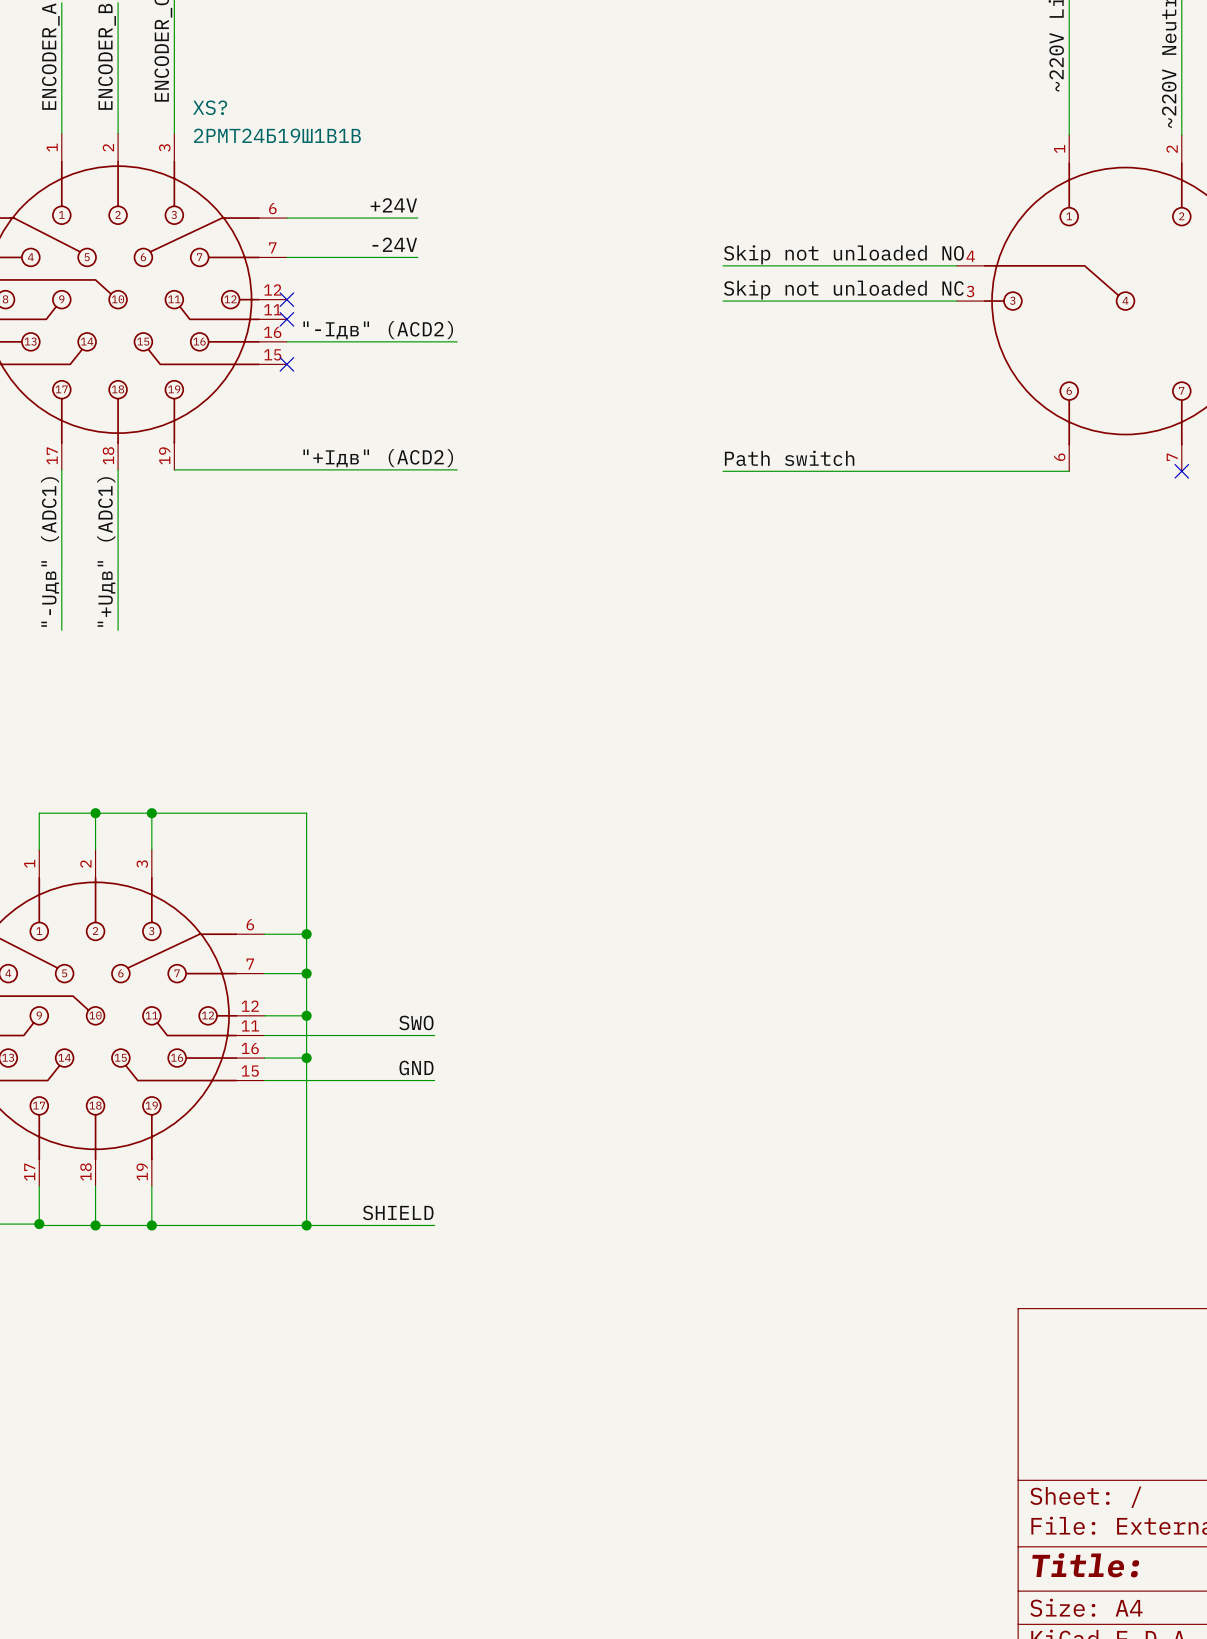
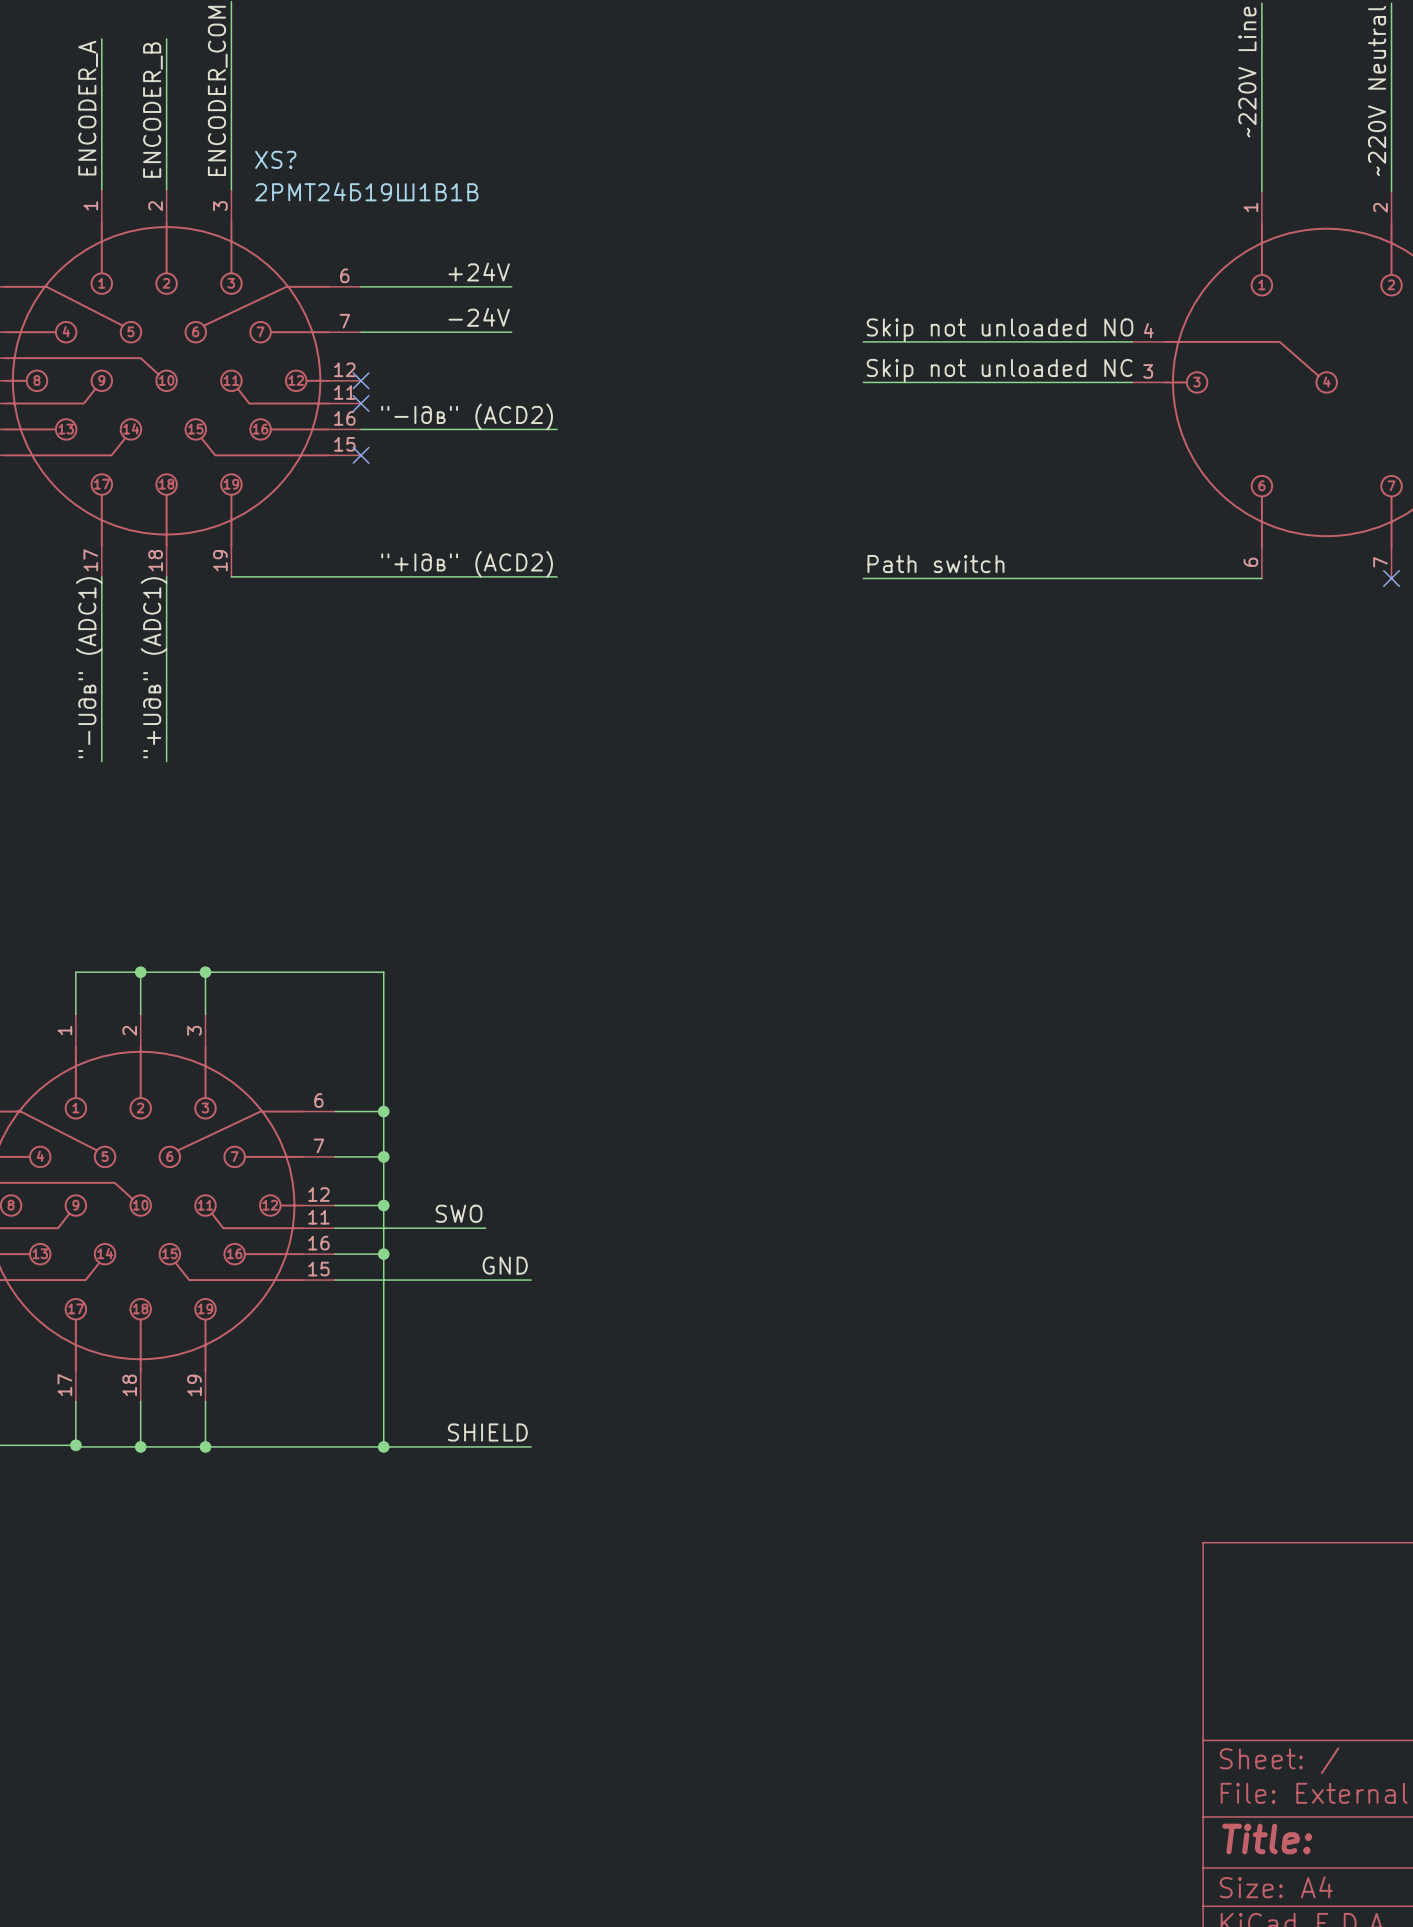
label position: SWO (416, 1022) -> SWO (459, 1213)
wire: (395, 1035) (434, 1035) -> none

